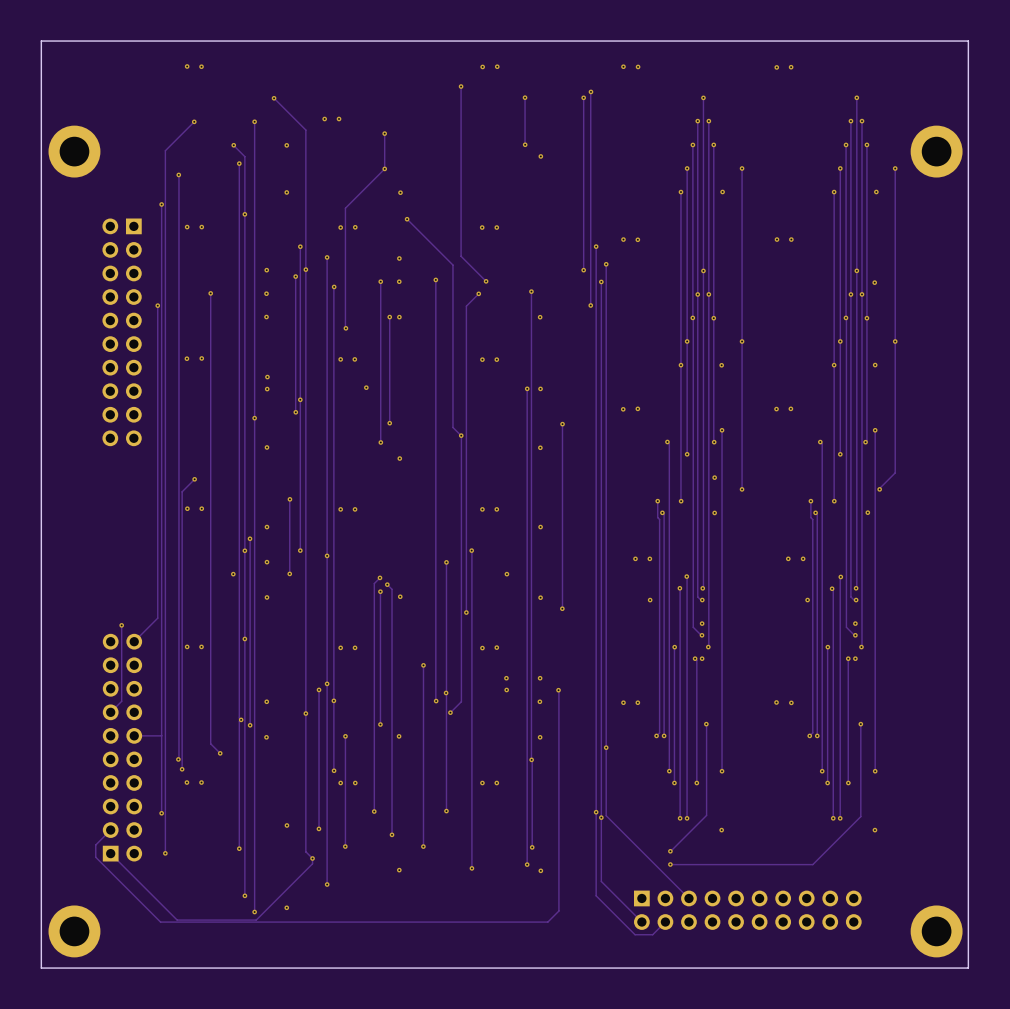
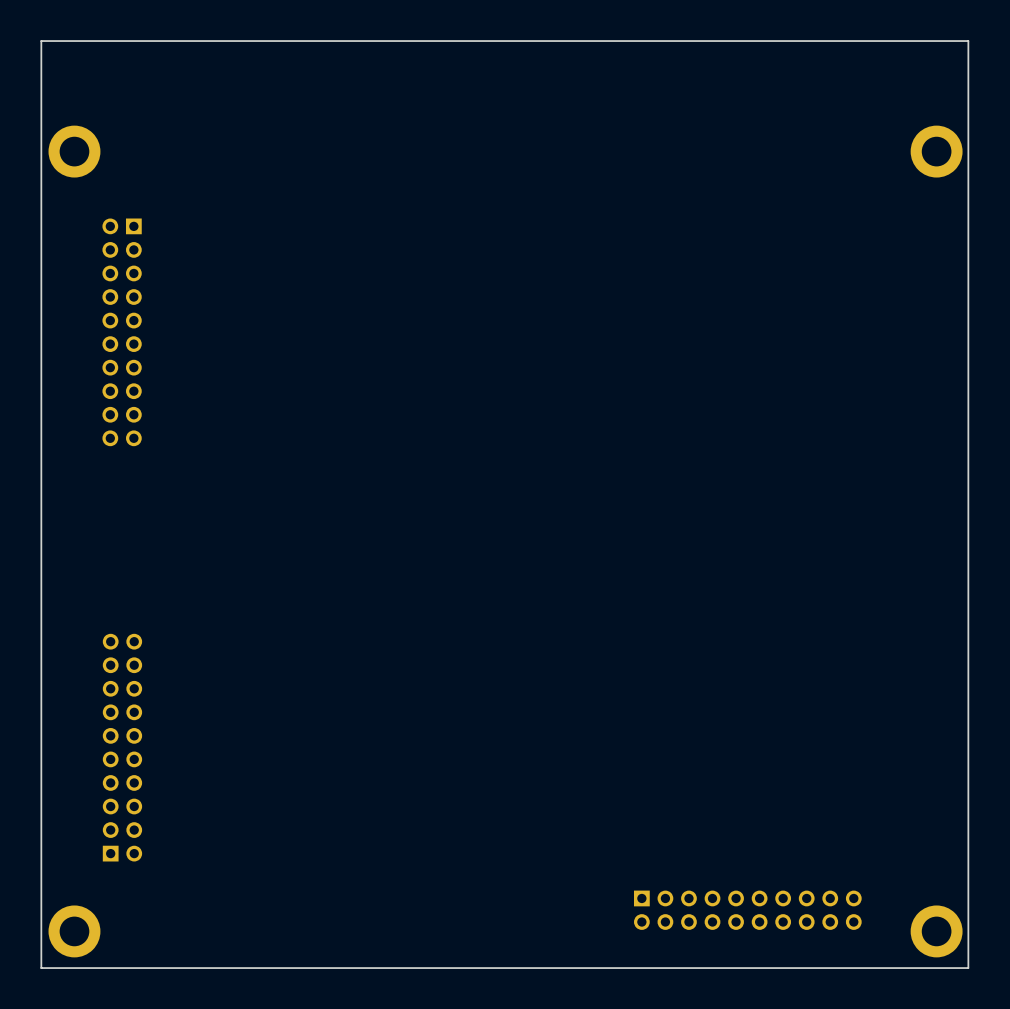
via: (187, 66) -> none
via: (201, 66) -> none
via: (482, 66) -> none
via: (497, 66) -> none
via: (623, 66) -> none
via: (638, 66) -> none
via: (776, 67) -> none
via: (791, 67) -> none
track: (461, 86) (461, 256) (486, 281) -> none
via: (461, 86) -> none
track: (590, 91) (590, 305) -> none
via: (590, 91) -> none
track: (525, 97) (525, 144) -> none
via: (525, 97) -> none
track: (583, 97) (583, 270) -> none
via: (583, 97) -> none
track: (703, 97) (702, 588) -> none
via: (703, 97) -> none
track: (856, 97) (856, 588) -> none
via: (856, 97) -> none
track: (274, 98) (305, 130) (305, 851) (312, 858) (312, 863) (256, 920) (177, 920) (110, 853) -> none
via: (274, 98) -> none
via: (324, 119) -> none
via: (339, 119) -> none
track: (194, 121) (165, 150) (165, 853) -> none
via: (194, 121) -> none
track: (254, 121) (254, 912) -> none
via: (254, 121) -> none
track: (697, 121) (697, 596) (700, 599) -> none
via: (697, 121) -> none
track: (708, 121) (708, 647) -> none
via: (708, 121) -> none
track: (850, 121) (850, 596) (853, 599) -> none
via: (850, 121) -> none
track: (862, 121) (861, 647) -> none
via: (862, 121) -> none
track: (384, 133) (384, 168) (345, 208) (345, 328) -> none
via: (384, 133) -> none
via: (525, 144) -> none
track: (692, 144) (692, 317) -> none
via: (692, 144) -> none
track: (713, 144) (713, 440) -> none
via: (713, 144) -> none
track: (846, 144) (846, 317) -> none
via: (846, 144) -> none
track: (866, 144) (865, 442) -> none
via: (866, 144) -> none
track: (233, 145) (244, 156) (244, 895) -> none
via: (233, 145) -> none
via: (286, 145) -> none
via: (540, 156) -> none
track: (239, 163) (239, 718) (241, 719) (239, 721) (239, 848) -> none
via: (239, 163) -> none
via: (384, 168) -> none
track: (687, 168) (687, 454) -> none
via: (687, 168) -> none
track: (742, 168) (742, 489) -> none
via: (742, 168) -> none
track: (840, 168) (840, 454) -> none
via: (840, 168) -> none
track: (895, 168) (895, 472) (878, 489) -> none
via: (895, 168) -> none
track: (178, 174) (178, 759) -> none
via: (178, 174) -> none
via: (722, 191) -> none
via: (876, 191) -> none
via: (286, 192) -> none
via: (400, 192) -> none
track: (680, 192) (681, 501) -> none
via: (680, 192) -> none
track: (834, 192) (834, 501) -> none
via: (834, 192) -> none
track: (161, 204) (161, 813) -> none
via: (161, 204) -> none
via: (244, 214) -> none
track: (407, 219) (452, 265) (452, 427) (461, 435) -> none
via: (407, 219) -> none
via: (187, 227) -> none
via: (201, 227) -> none
via: (340, 227) -> none
via: (355, 227) -> none
via: (482, 227) -> none
via: (496, 227) -> none
via: (623, 239) -> none
via: (637, 239) -> none
via: (776, 239) -> none
via: (791, 239) -> none
track: (300, 246) (300, 550) -> none
via: (300, 246) -> none
track: (596, 246) (596, 895) (635, 934) (652, 934) (665, 922) -> none
via: (596, 246) -> none
track: (327, 257) (327, 884) -> none
via: (327, 257) -> none
via: (399, 258) -> none
track: (606, 264) (606, 815) (688, 898) -> none
via: (606, 264) -> none
via: (305, 269) -> none
via: (266, 270) -> none
via: (583, 270) -> none
via: (703, 270) -> none
via: (856, 270) -> none
track: (295, 276) (295, 412) -> none
via: (295, 276) -> none
track: (435, 279) (436, 701) -> none
via: (435, 279) -> none
track: (380, 281) (380, 442) -> none
via: (380, 281) -> none
via: (399, 281) -> none
via: (486, 281) -> none
track: (601, 281) (601, 881) (641, 922) -> none
via: (601, 281) -> none
via: (874, 282) -> none
track: (334, 286) (334, 770) -> none
via: (334, 286) -> none
track: (531, 291) (532, 847) -> none
via: (531, 291) -> none
track: (210, 293) (210, 743) (220, 753) -> none
via: (210, 293) -> none
via: (266, 293) -> none
track: (478, 293) (466, 306) (466, 612) -> none
via: (478, 293) -> none
via: (697, 294) -> none
via: (708, 294) -> none
via: (850, 294) -> none
via: (862, 294) -> none
track: (157, 305) (157, 618) (134, 641) -> none
via: (157, 305) -> none
via: (590, 305) -> none
via: (266, 317) -> none
track: (389, 317) (389, 423) -> none
via: (389, 317) -> none
via: (399, 317) -> none
via: (540, 317) -> none
track: (692, 317) (693, 627) (701, 635) -> none
via: (692, 317) -> none
track: (845, 317) (846, 627) (854, 635) -> none
via: (845, 317) -> none
via: (713, 318) -> none
via: (866, 318) -> none
via: (345, 328) -> none
via: (687, 341) -> none
via: (742, 341) -> none
via: (840, 341) -> none
via: (895, 341) -> none
via: (186, 358) -> none
via: (201, 358) -> none
via: (340, 359) -> none
via: (354, 359) -> none
via: (482, 359) -> none
via: (496, 359) -> none
via: (680, 365) -> none
via: (721, 365) -> none
via: (834, 365) -> none
via: (875, 365) -> none
via: (267, 377) -> none
via: (366, 387) -> none
track: (527, 388) (527, 864) -> none
via: (527, 388) -> none
via: (540, 388) -> none
via: (267, 389) -> none
via: (300, 399) -> none
via: (637, 408) -> none
via: (790, 408) -> none
via: (623, 409) -> none
via: (776, 409) -> none
via: (295, 412) -> none
via: (254, 418) -> none
via: (389, 423) -> none
track: (562, 424) (562, 608) -> none
via: (562, 424) -> none
track: (722, 430) (722, 771) -> none
via: (722, 430) -> none
track: (875, 430) (875, 771) -> none
via: (875, 430) -> none
track: (461, 435) (461, 701) (450, 712) -> none
via: (461, 435) -> none
track: (667, 441) (669, 443) (669, 771) -> none
via: (667, 441) -> none
via: (380, 442) -> none
via: (714, 442) -> none
track: (820, 442) (822, 443) (822, 771) -> none
via: (820, 442) -> none
via: (865, 442) -> none
via: (266, 447) -> none
via: (540, 447) -> none
via: (687, 454) -> none
via: (840, 454) -> none
via: (399, 458) -> none
via: (714, 477) -> none
track: (194, 479) (182, 491) (182, 769) -> none
via: (194, 479) -> none
via: (742, 489) -> none
via: (879, 489) -> none
track: (289, 499) (289, 573) -> none
via: (289, 499) -> none
track: (657, 501) (657, 517) (659, 519) (659, 732) (656, 735) -> none
via: (657, 501) -> none
via: (681, 501) -> none
track: (810, 501) (810, 517) (812, 519) (812, 732) (809, 735) -> none
via: (810, 501) -> none
via: (834, 501) -> none
via: (187, 508) -> none
via: (201, 508) -> none
via: (340, 509) -> none
via: (355, 509) -> none
via: (482, 509) -> none
via: (496, 509) -> none
track: (662, 512) (664, 514) (664, 735) -> none
via: (662, 512) -> none
via: (714, 512) -> none
track: (815, 512) (817, 514) (817, 735) -> none
via: (815, 512) -> none
via: (867, 512) -> none
via: (266, 527) -> none
via: (540, 527) -> none
track: (250, 538) (250, 725) -> none
via: (250, 538) -> none
via: (244, 550) -> none
via: (300, 550) -> none
track: (471, 550) (471, 868) -> none
via: (471, 550) -> none
via: (327, 555) -> none
via: (635, 558) -> none
via: (649, 558) -> none
via: (788, 558) -> none
via: (803, 558) -> none
via: (266, 562) -> none
track: (446, 562) (446, 811) -> none
via: (446, 562) -> none
via: (289, 573) -> none
via: (233, 574) -> none
via: (506, 574) -> none
track: (686, 576) (687, 818) -> none
via: (686, 576) -> none
track: (840, 576) (840, 818) -> none
via: (840, 576) -> none
track: (379, 577) (374, 583) (374, 811) -> none
via: (379, 577) -> none
track: (387, 584) (392, 589) (392, 834) -> none
via: (387, 584) -> none
track: (679, 588) (680, 818) -> none
via: (679, 588) -> none
via: (702, 588) -> none
via: (832, 588) -> none
track: (833, 588) (833, 818) -> none
via: (856, 588) -> none
track: (380, 591) (380, 724) -> none
via: (380, 591) -> none
via: (400, 596) -> none
via: (266, 597) -> none
via: (540, 597) -> none
via: (650, 600) -> none
via: (702, 600) -> none
via: (807, 600) -> none
via: (856, 600) -> none
via: (562, 608) -> none
via: (466, 612) -> none
via: (702, 623) -> none
via: (855, 623) -> none
track: (121, 625) (121, 701) (110, 712) -> none
via: (121, 625) -> none
via: (702, 635) -> none
via: (855, 635) -> none
via: (244, 638) -> none
via: (187, 646) -> none
via: (201, 646) -> none
via: (340, 647) -> none
via: (355, 647) -> none
via: (496, 647) -> none
track: (674, 647) (674, 783) -> none
via: (674, 647) -> none
via: (708, 647) -> none
track: (827, 647) (827, 783) -> none
via: (827, 647) -> none
via: (861, 647) -> none
via: (482, 648) -> none
track: (695, 658) (696, 660) (696, 783) -> none
via: (695, 658) -> none
via: (702, 658) -> none
track: (848, 658) (848, 781) (849, 783) -> none
via: (848, 658) -> none
via: (855, 658) -> none
track: (423, 665) (423, 846) -> none
via: (423, 665) -> none
via: (506, 678) -> none
via: (540, 678) -> none
via: (327, 683) -> none
track: (319, 689) (319, 828) -> none
via: (319, 689) -> none
via: (506, 690) -> none
track: (558, 690) (558, 911) (547, 922) (160, 922) (95, 857) (95, 845) (110, 830) -> none
via: (558, 690) -> none
via: (446, 692) -> none
via: (333, 700) -> none
via: (266, 701) -> none
via: (436, 701) -> none
via: (539, 701) -> none
via: (623, 702) -> none
via: (637, 702) -> none
via: (776, 702) -> none
via: (791, 702) -> none
via: (450, 712) -> none
via: (305, 713) -> none
via: (241, 719) -> none
via: (380, 724) -> none
track: (706, 724) (706, 815) (670, 851) -> none
via: (706, 724) -> none
track: (860, 724) (860, 816) (812, 864) (670, 864) -> none
via: (860, 724) -> none
via: (250, 725) -> none
track: (161, 735) (134, 735) -> none
via: (656, 735) -> none
via: (664, 735) -> none
via: (809, 735) -> none
via: (817, 735) -> none
track: (345, 736) (345, 846) -> none
via: (345, 736) -> none
via: (399, 736) -> none
via: (266, 737) -> none
via: (540, 737) -> none
via: (606, 747) -> none
via: (220, 753) -> none
via: (178, 759) -> none
via: (531, 759) -> none
via: (182, 769) -> none
via: (334, 770) -> none
via: (669, 771) -> none
via: (722, 771) -> none
via: (822, 771) -> none
via: (875, 771) -> none
via: (186, 782) -> none
via: (201, 782) -> none
via: (340, 783) -> none
via: (355, 783) -> none
via: (482, 783) -> none
via: (496, 783) -> none
via: (674, 783) -> none
via: (696, 783) -> none
via: (827, 783) -> none
via: (848, 783) -> none
via: (374, 811) -> none
via: (446, 811) -> none
via: (596, 812) -> none
via: (161, 813) -> none
via: (601, 817) -> none
via: (680, 818) -> none
via: (687, 818) -> none
via: (833, 818) -> none
via: (840, 818) -> none
via: (286, 825) -> none
via: (318, 828) -> none
via: (721, 830) -> none
via: (874, 830) -> none
via: (392, 834) -> none
via: (345, 846) -> none
via: (423, 846) -> none
via: (532, 847) -> none
via: (239, 848) -> none
via: (670, 851) -> none
via: (165, 853) -> none
via: (312, 858) -> none
via: (527, 864) -> none
via: (670, 864) -> none
via: (471, 868) -> none
via: (399, 870) -> none
via: (540, 870) -> none
via: (327, 884) -> none
via: (244, 895) -> none
via: (286, 907) -> none
via: (254, 912) -> none

